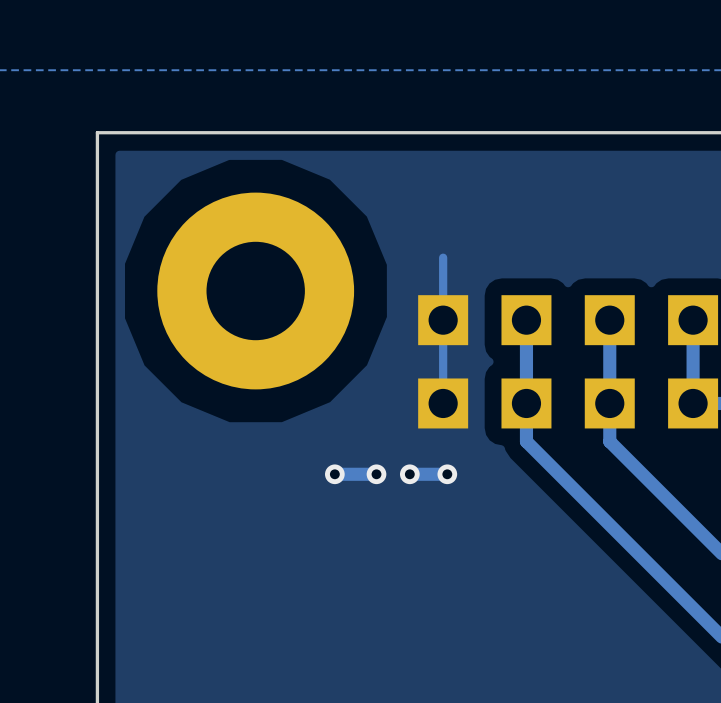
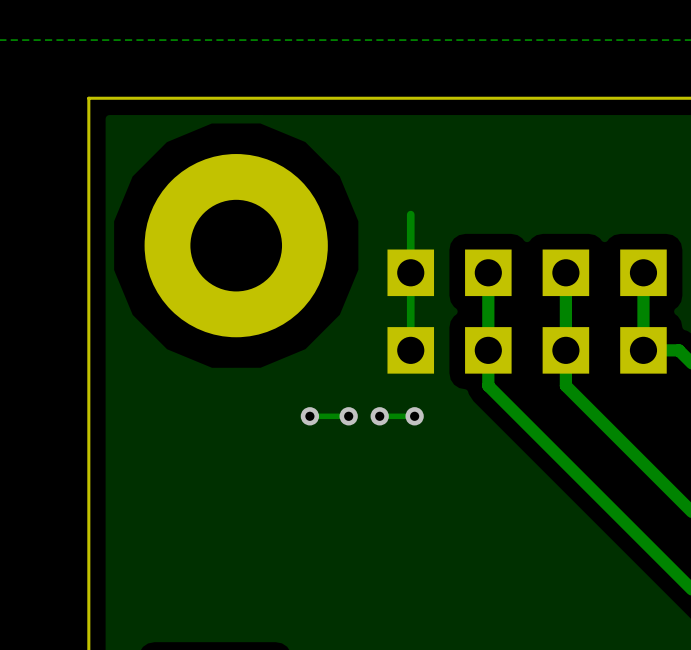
track width: thick (376, 474) (334, 474) -> thin (348, 416) (309, 416)
track width: thick (447, 474) (409, 474) -> thin (414, 416) (379, 416)

